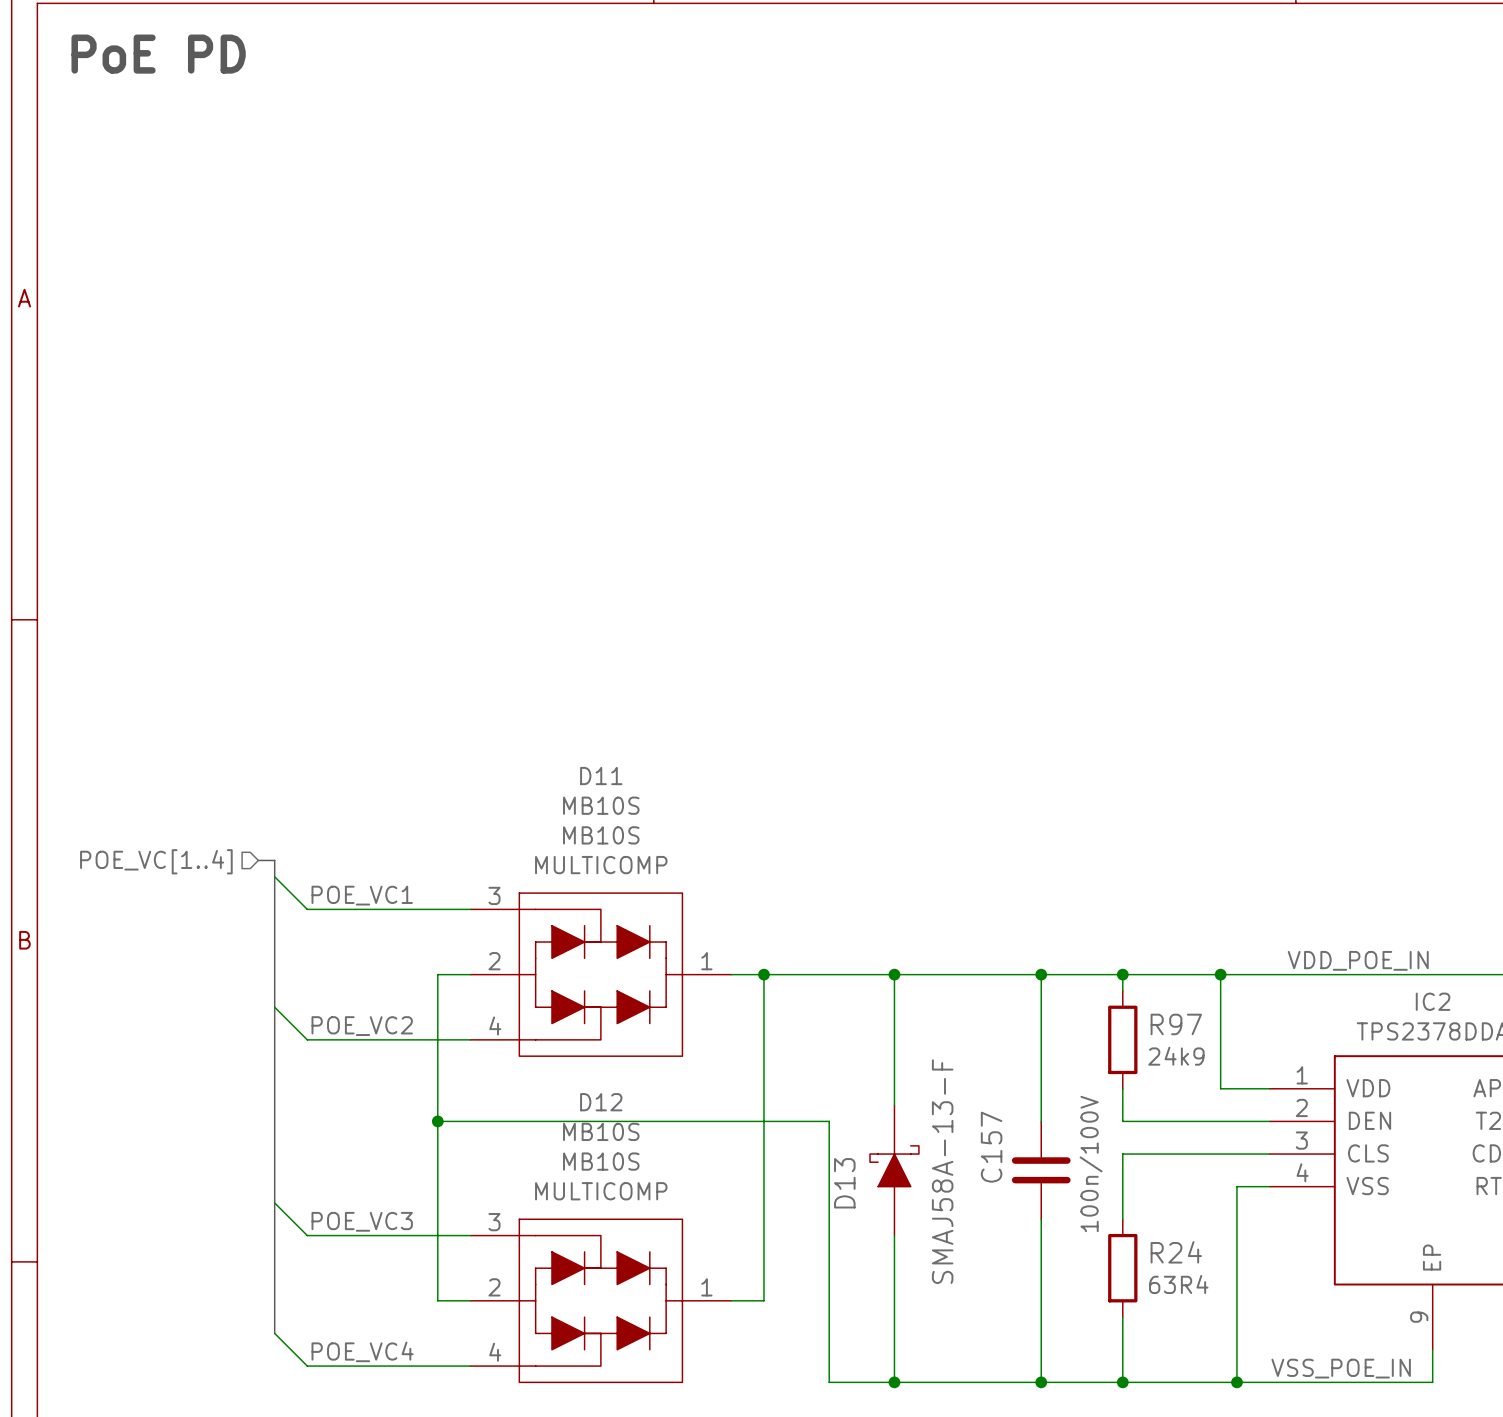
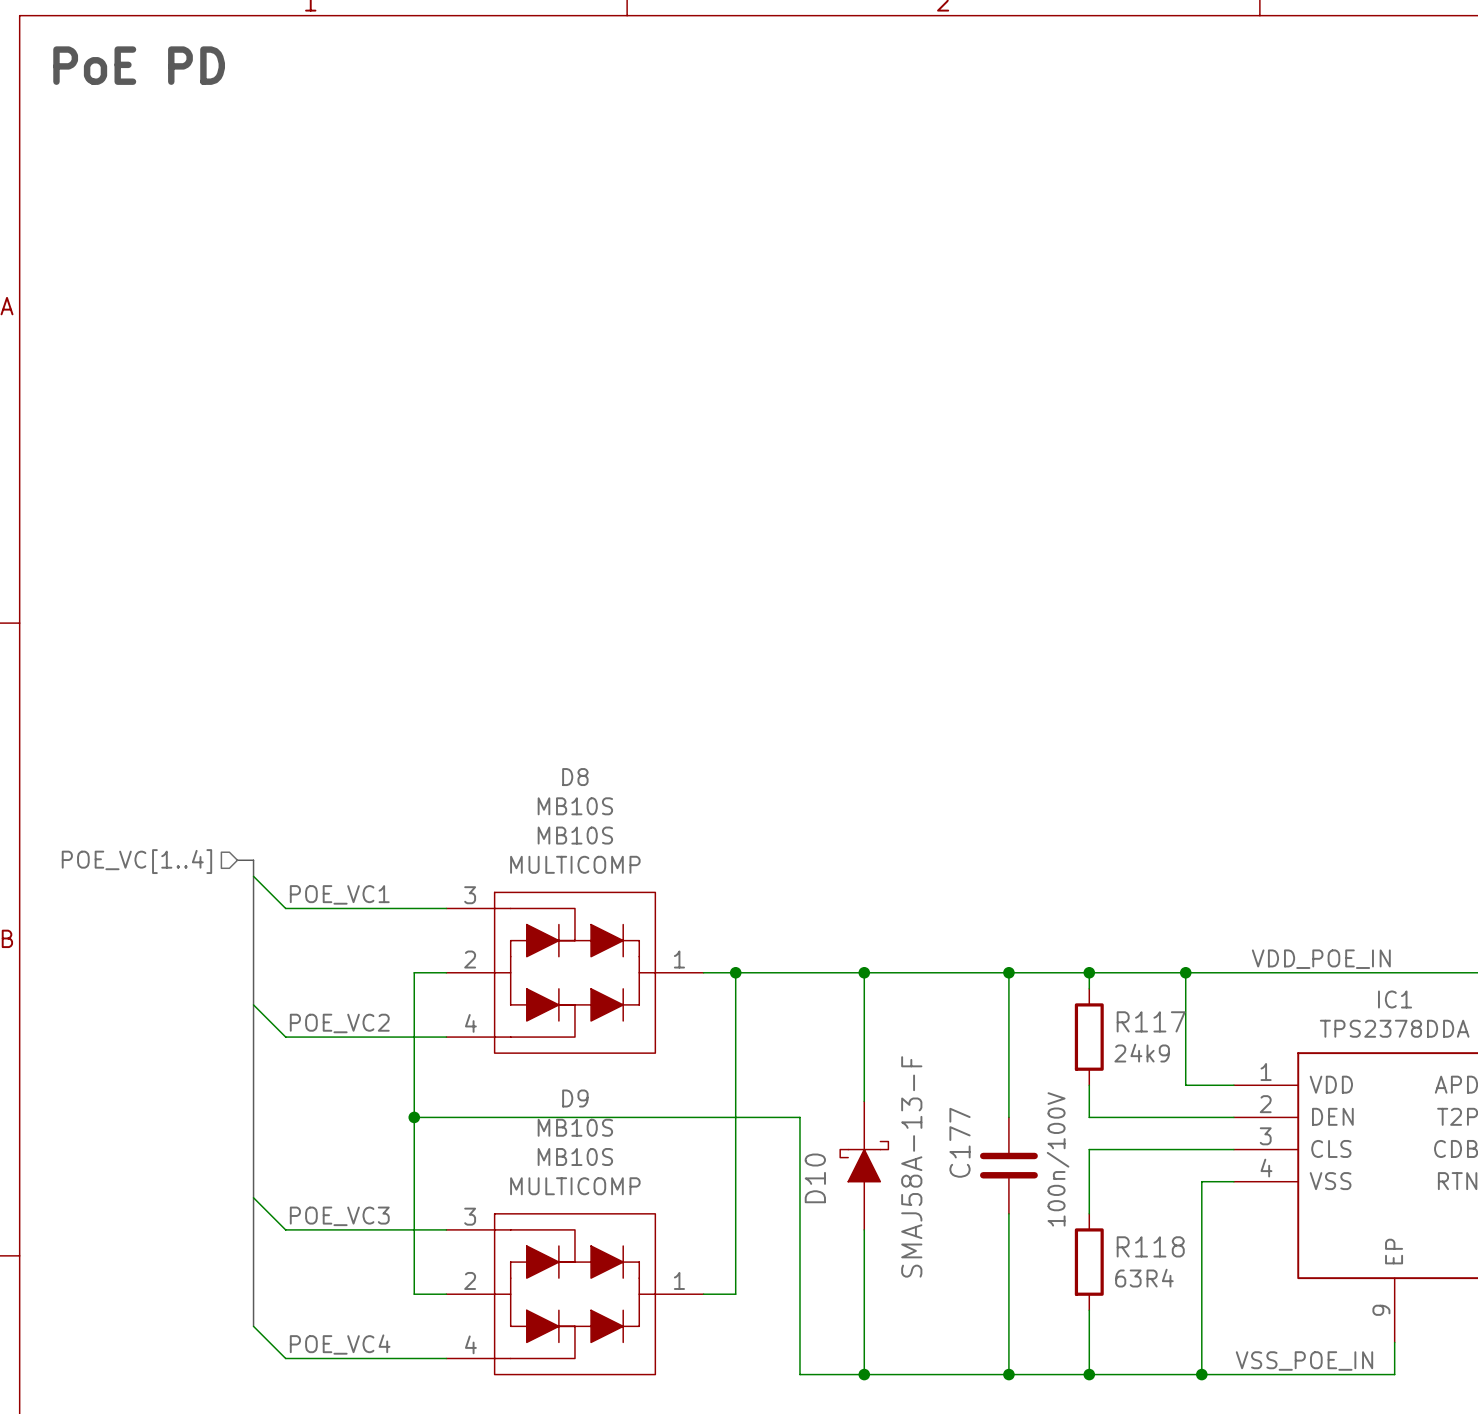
D11 name: D11 (601, 776) -> D8 (575, 777)
IC2 name: IC2 (1433, 1001) -> IC1 (1395, 999)
R97 name: R97 (1176, 1024) -> R117 (1151, 1021)
D12 name: D12 (601, 1102) -> D9 (575, 1098)
C157 name: C157 (991, 1147) -> C177 (959, 1142)
D13 name: D13 (844, 1183) -> D10 (815, 1178)
R24 name: R24 (1176, 1252) -> R118 (1150, 1246)

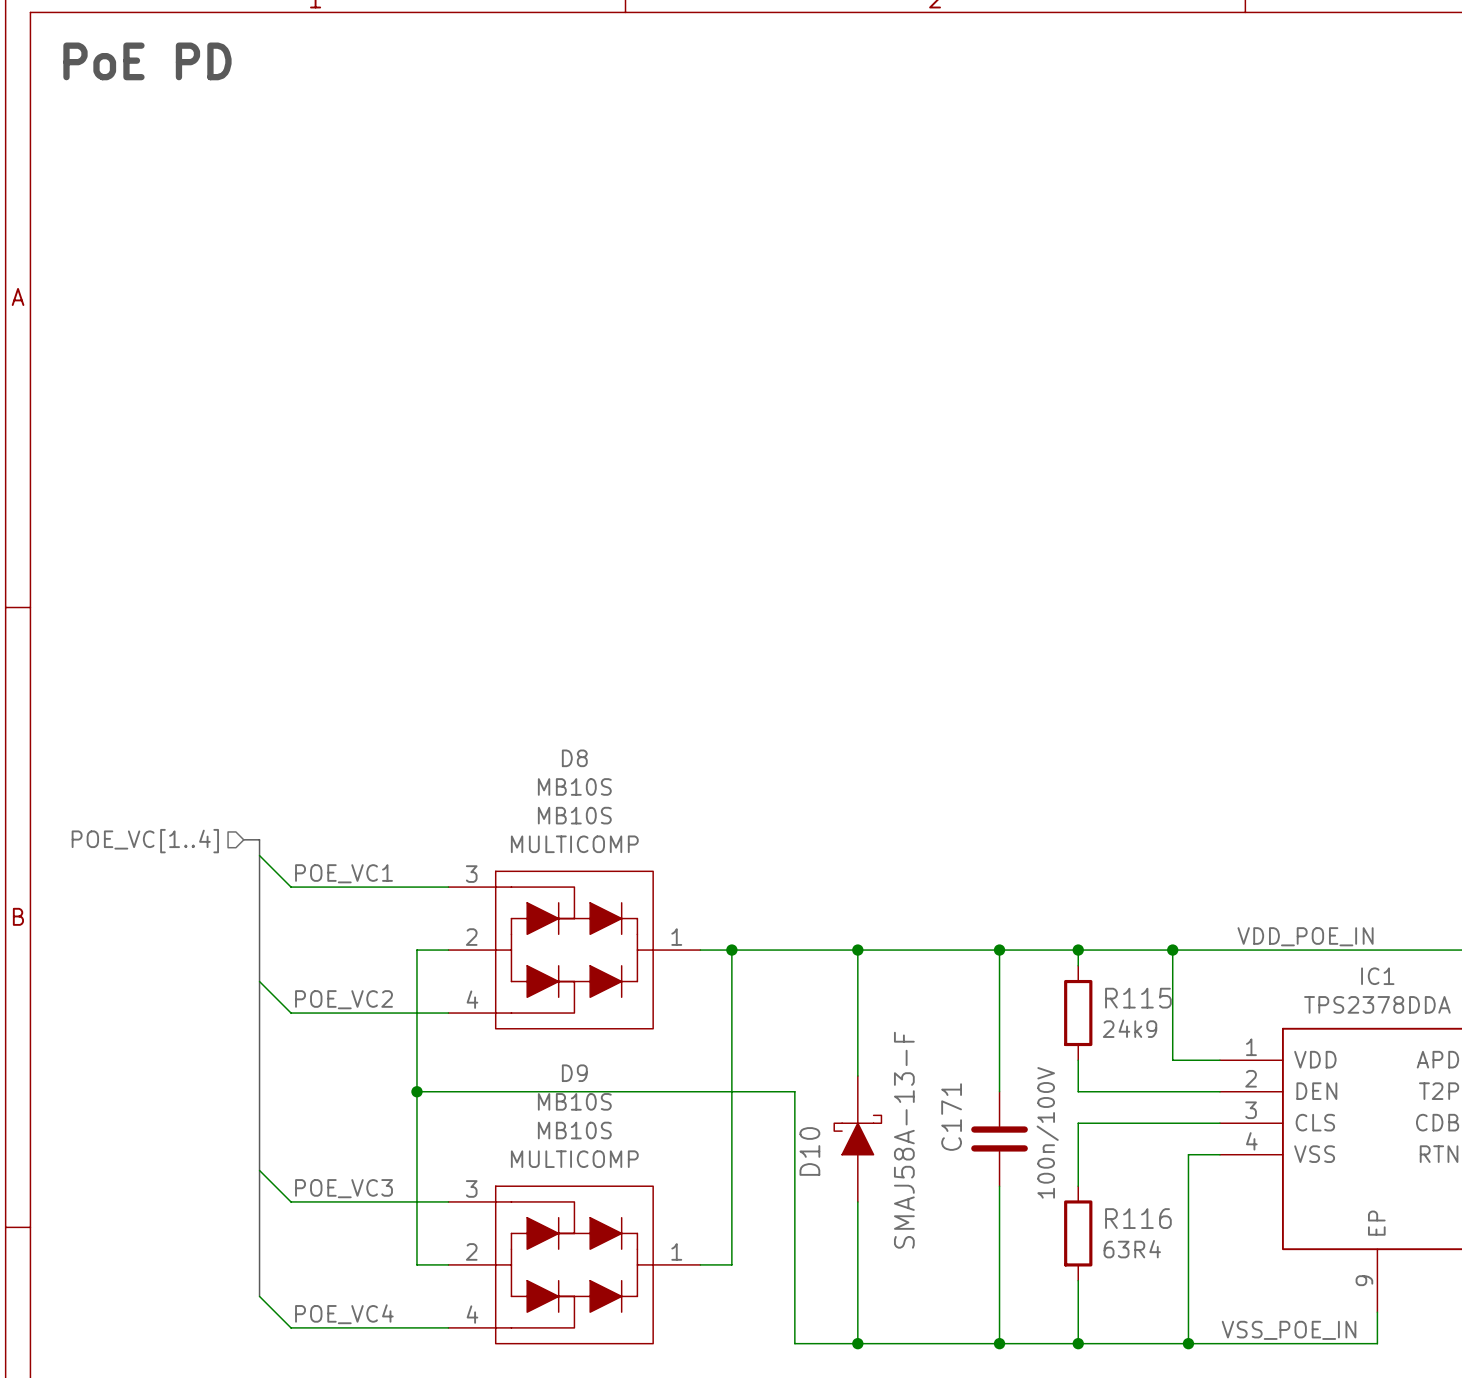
R117 name: R117 (1151, 1021) -> R115 (1138, 998)
C177 name: C177 (959, 1142) -> C171 (951, 1117)
R118 name: R118 (1150, 1246) -> R116 (1138, 1218)

